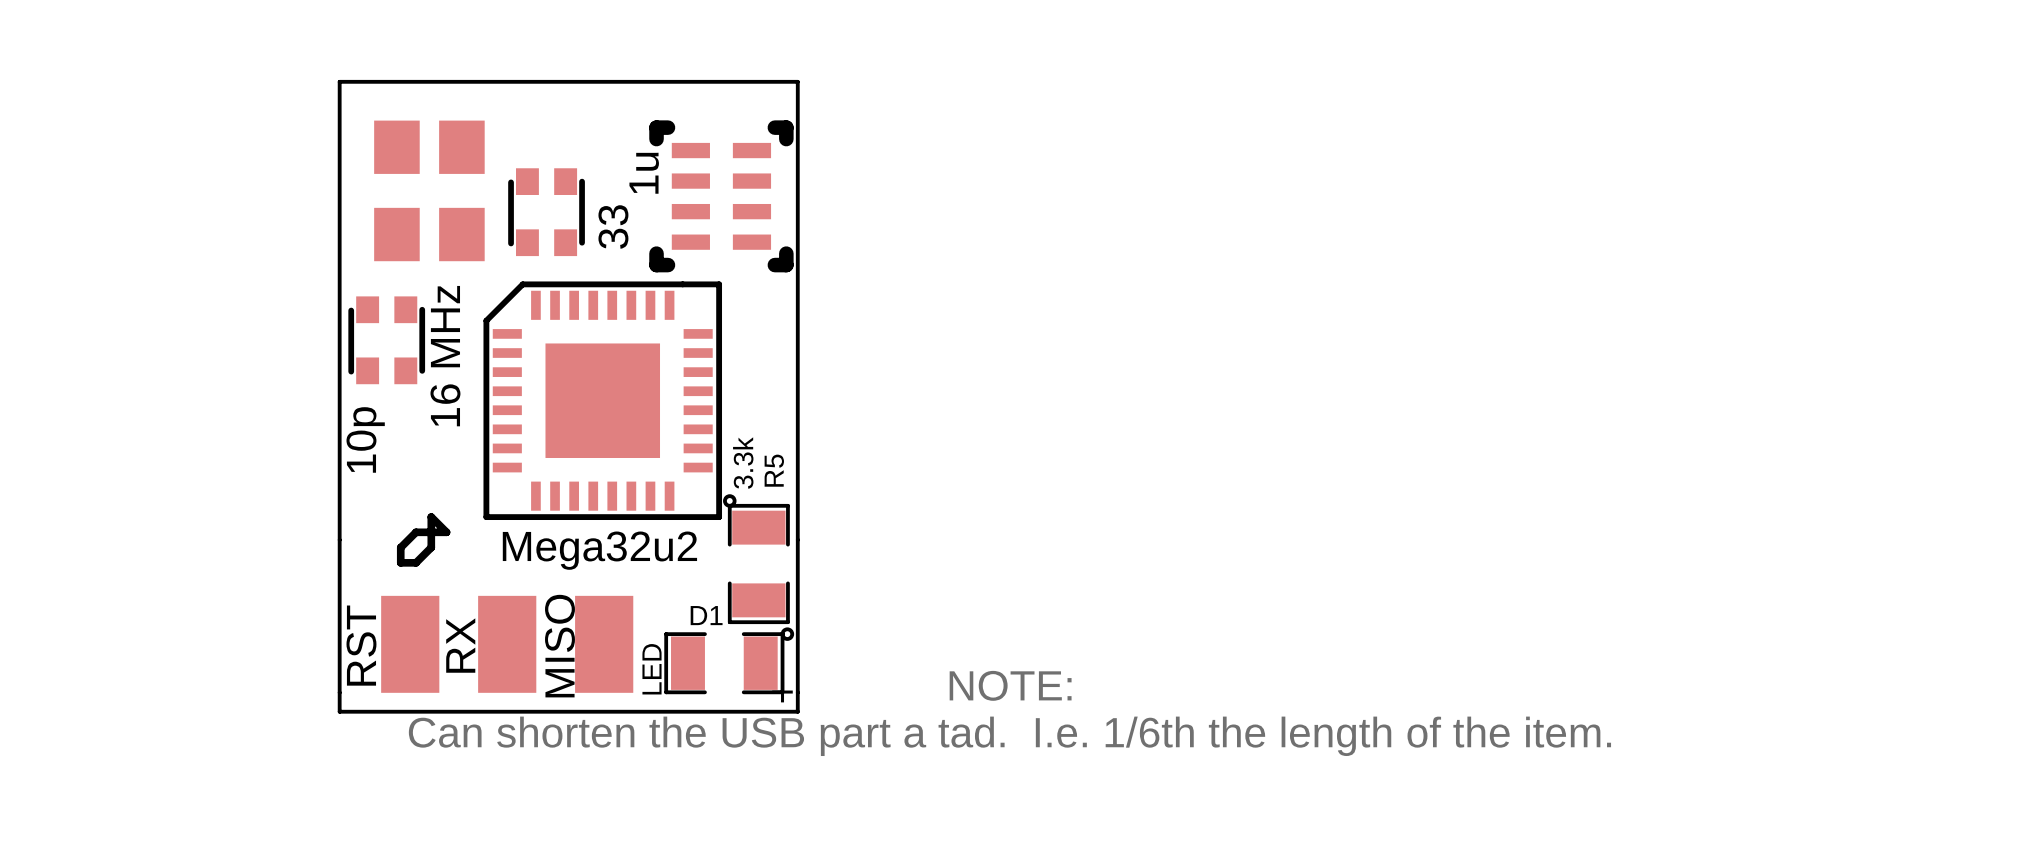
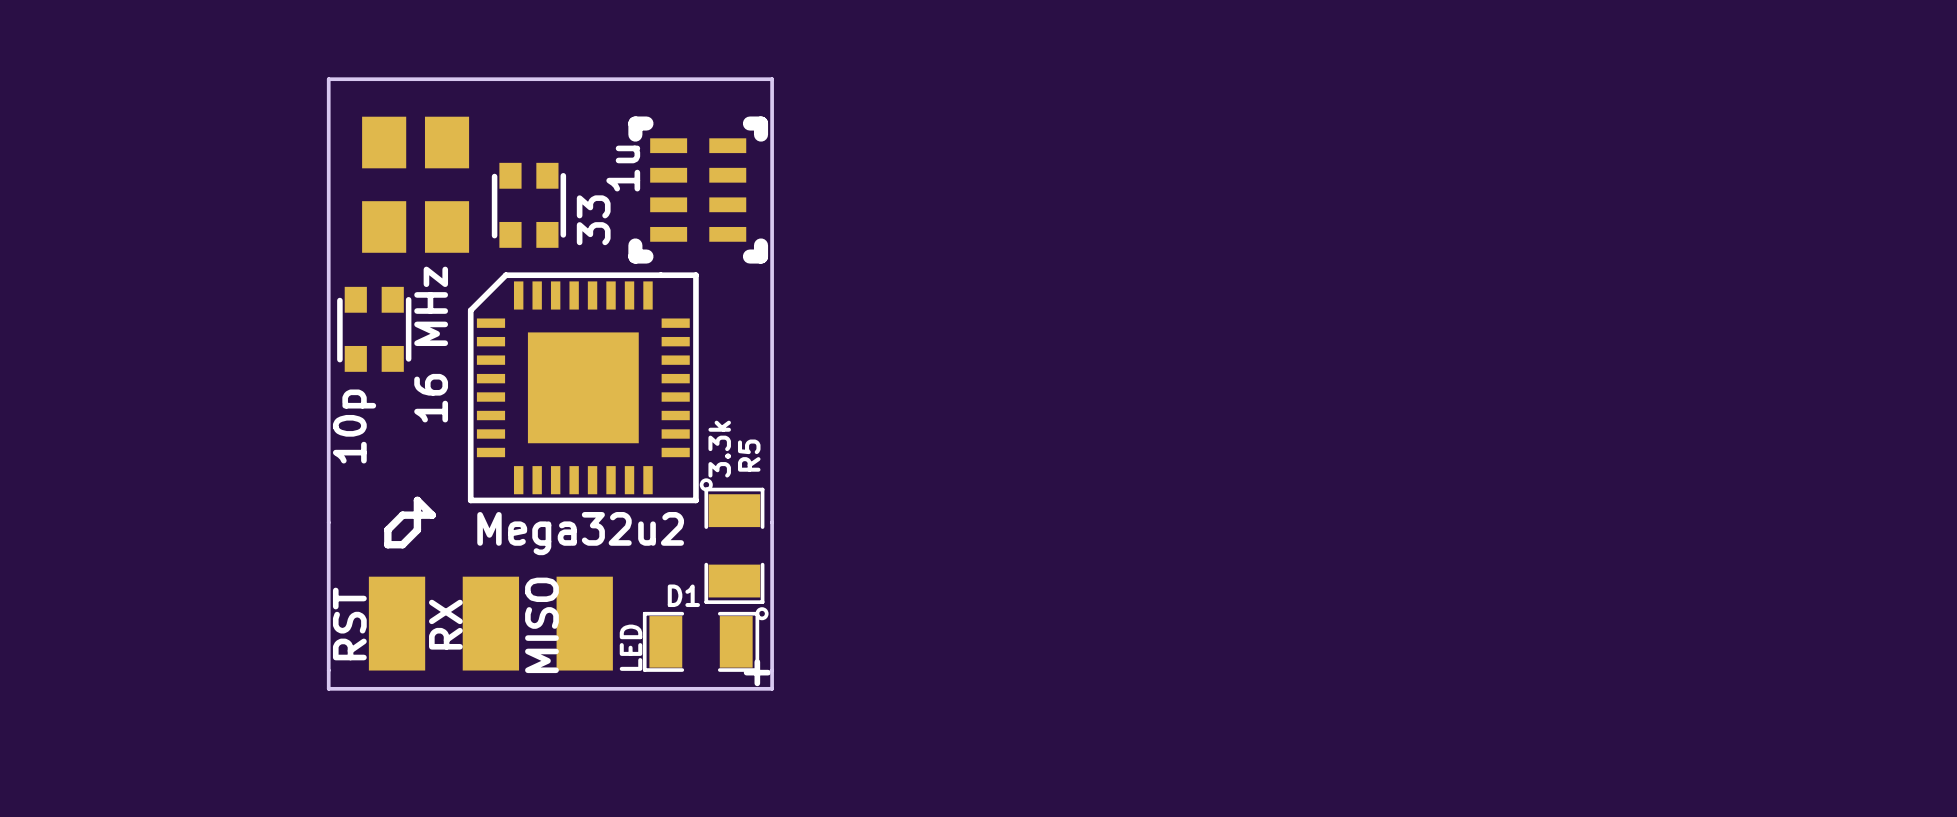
text: NOTE: (1010, 685) -> none
text: Can shorten the USB part a tad. I.e. 1/6th the length of the item. (1009, 736) -> none

